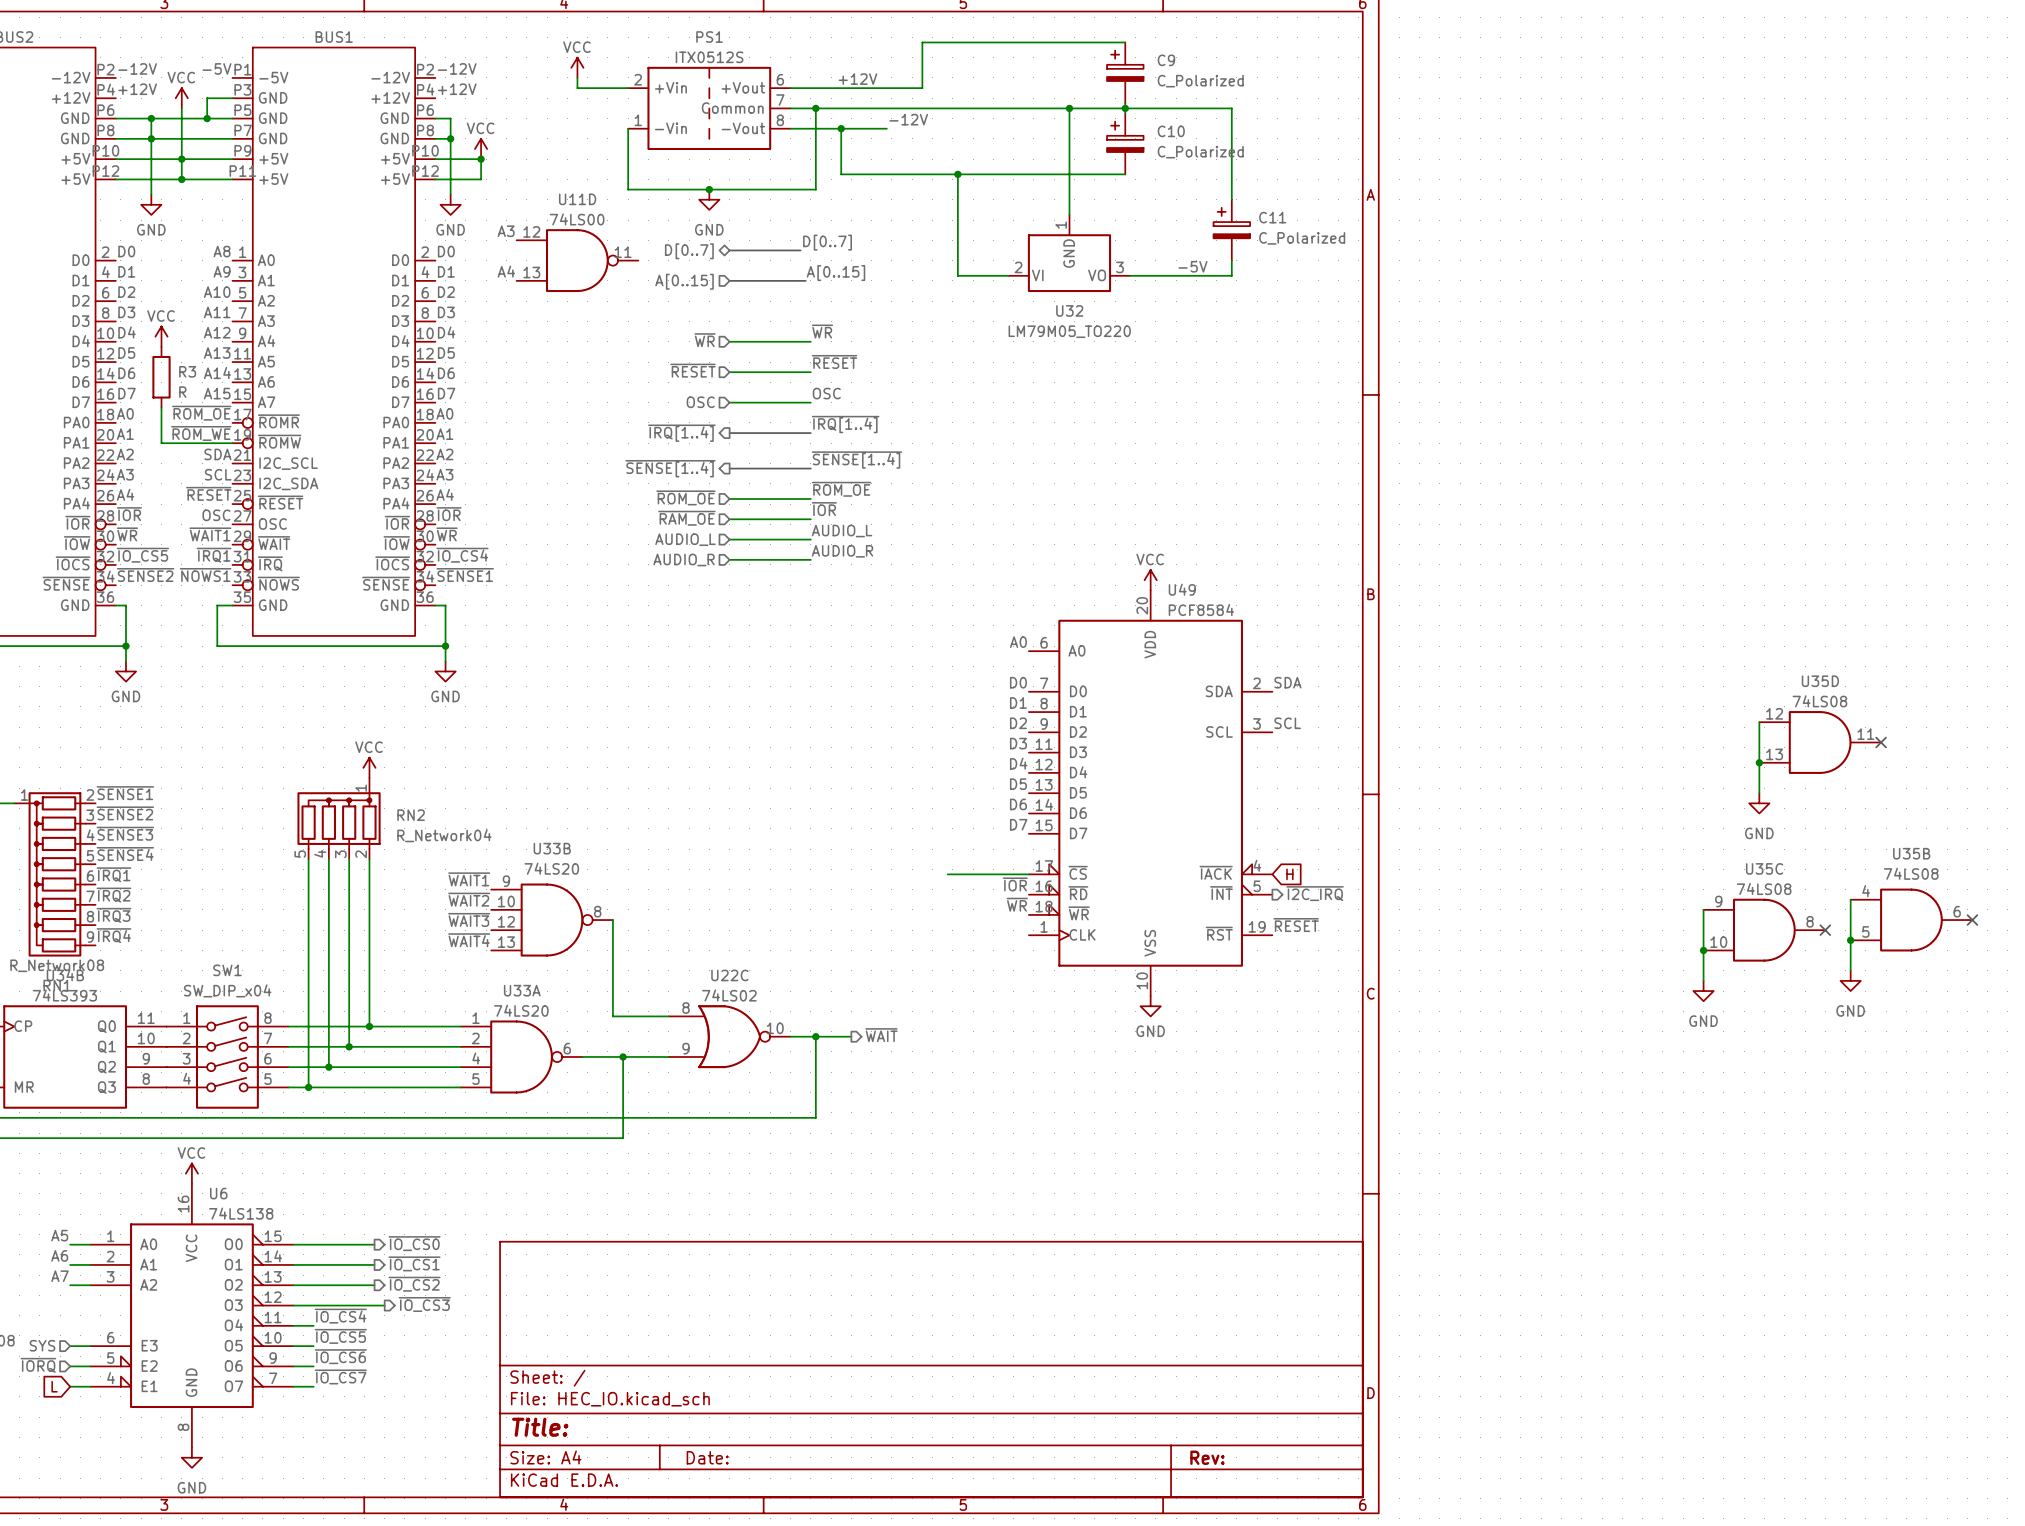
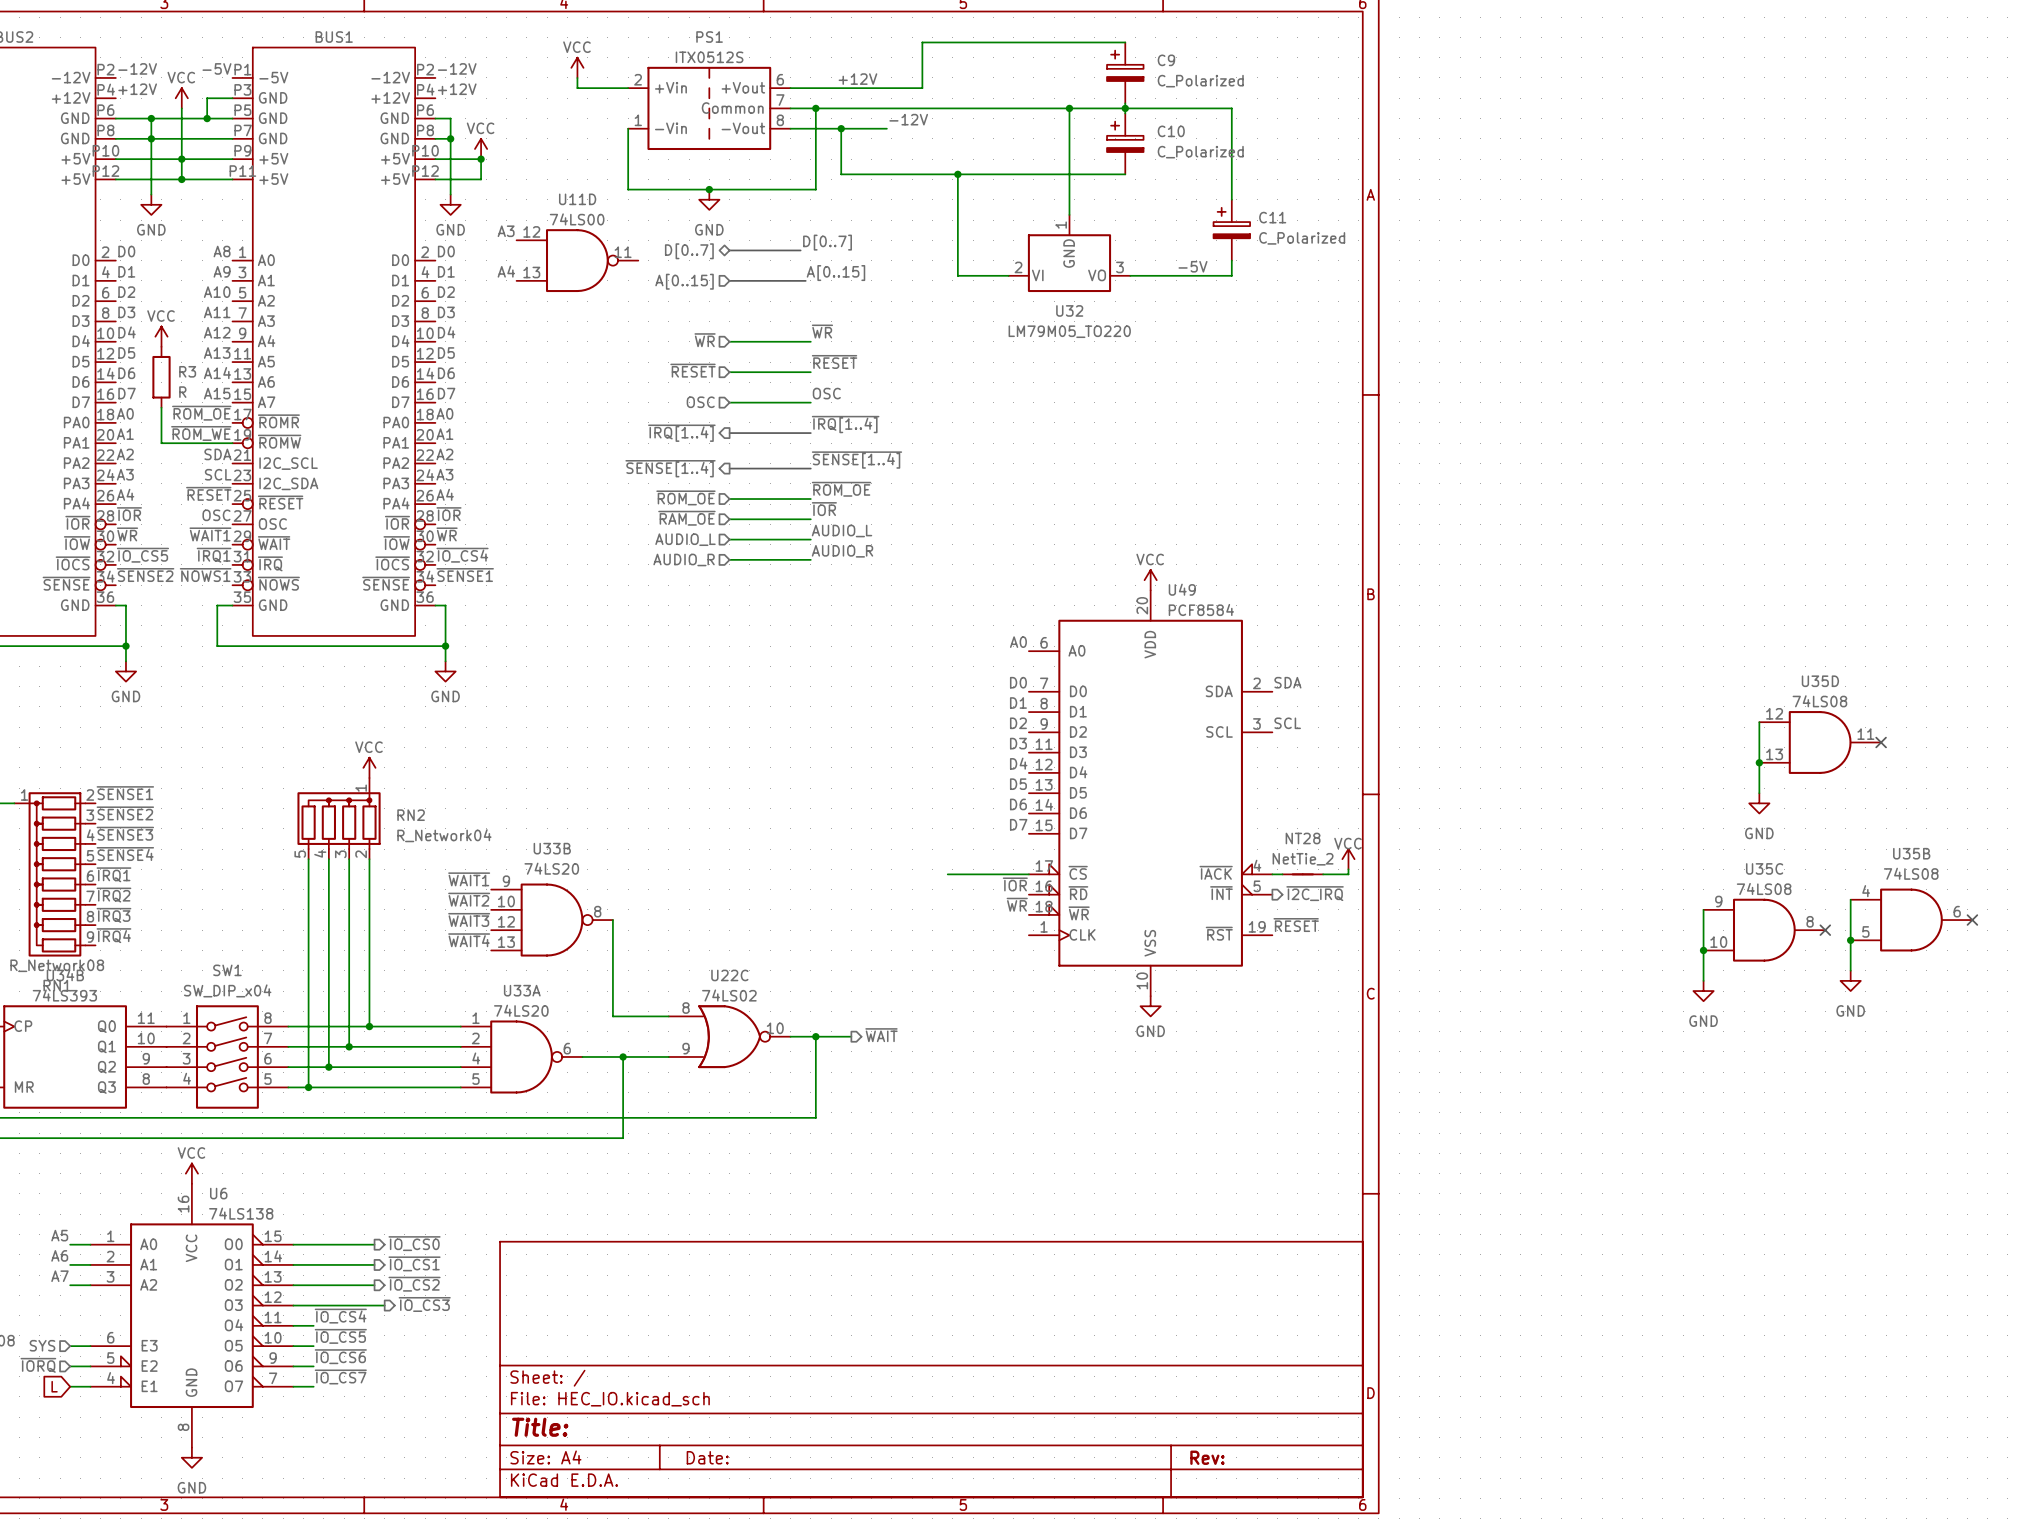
power symbol: none -> VCC (1348, 859)
wire: none -> (1348, 869) (1348, 874) (1323, 874)
wire: none -> (1272, 874) (1282, 874)
global label: H (1289, 874) -> none
NT28: none -> NetTie_2 (1302, 874)

